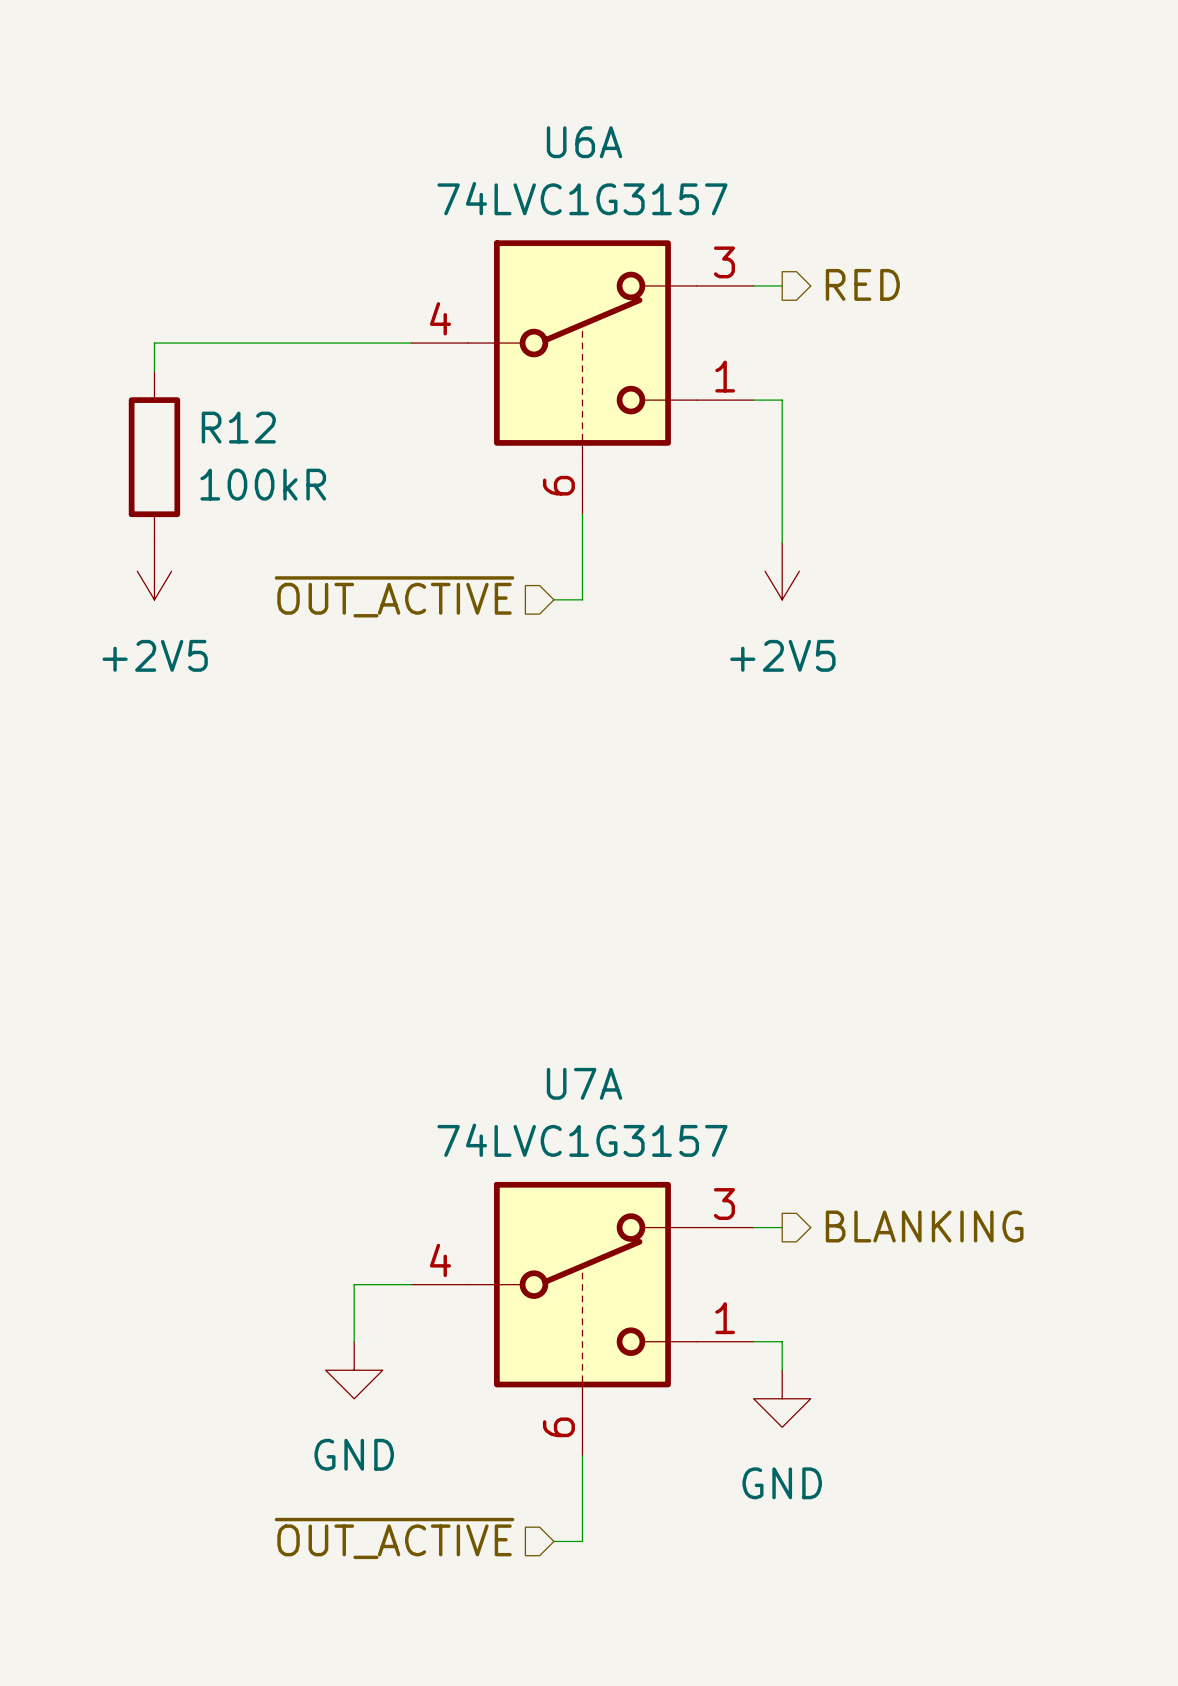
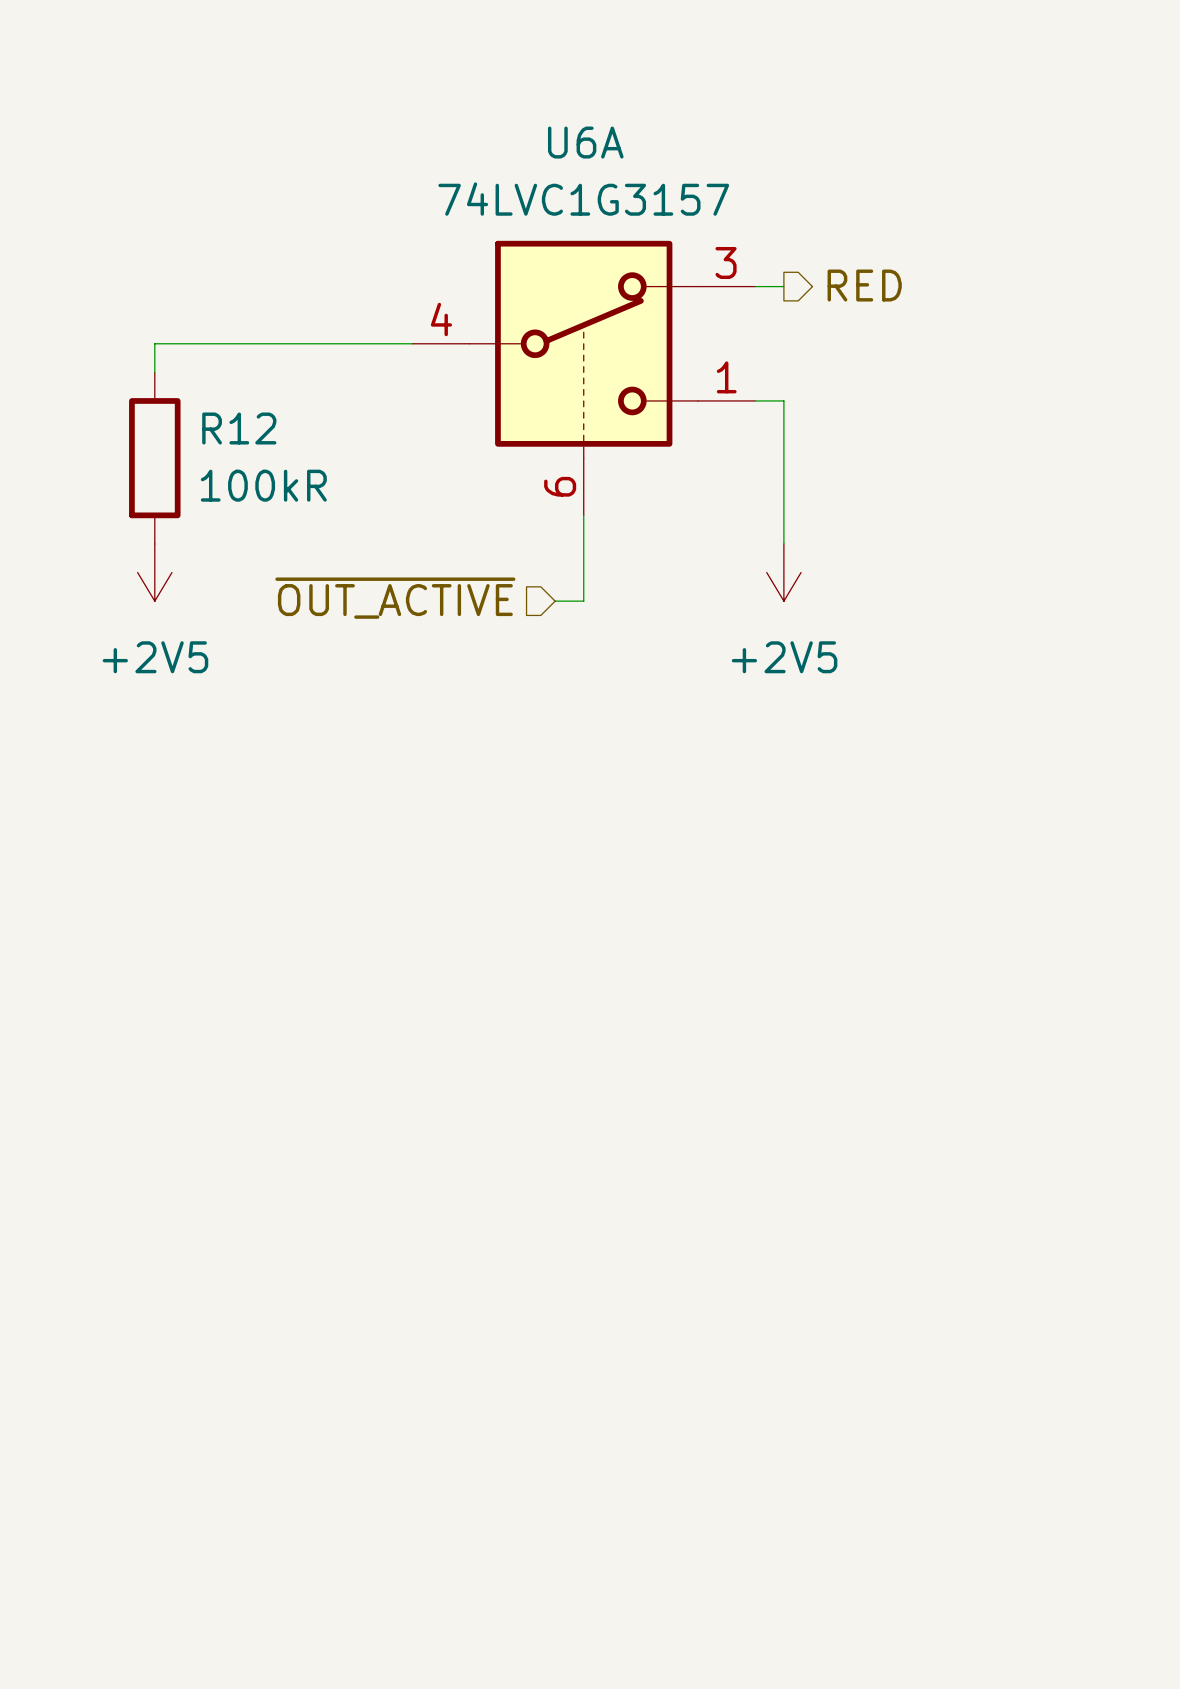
hierarchical label: BLANKING (924, 1226) -> none
wire: (753, 1227) (782, 1227) -> none
wire: (411, 1284) (354, 1284) (354, 1341) -> none
U7A: 74LVC1G3157 (582, 1318) -> none
wire: (753, 1341) (782, 1341) (782, 1370) -> none
power symbol: GND (354, 1370) -> none
power symbol: GND (782, 1398) -> none
wire: (582, 1455) (582, 1541) (553, 1541) -> none
hierarchical label: ~{OUT_ACTIVE} (394, 1538) -> none

